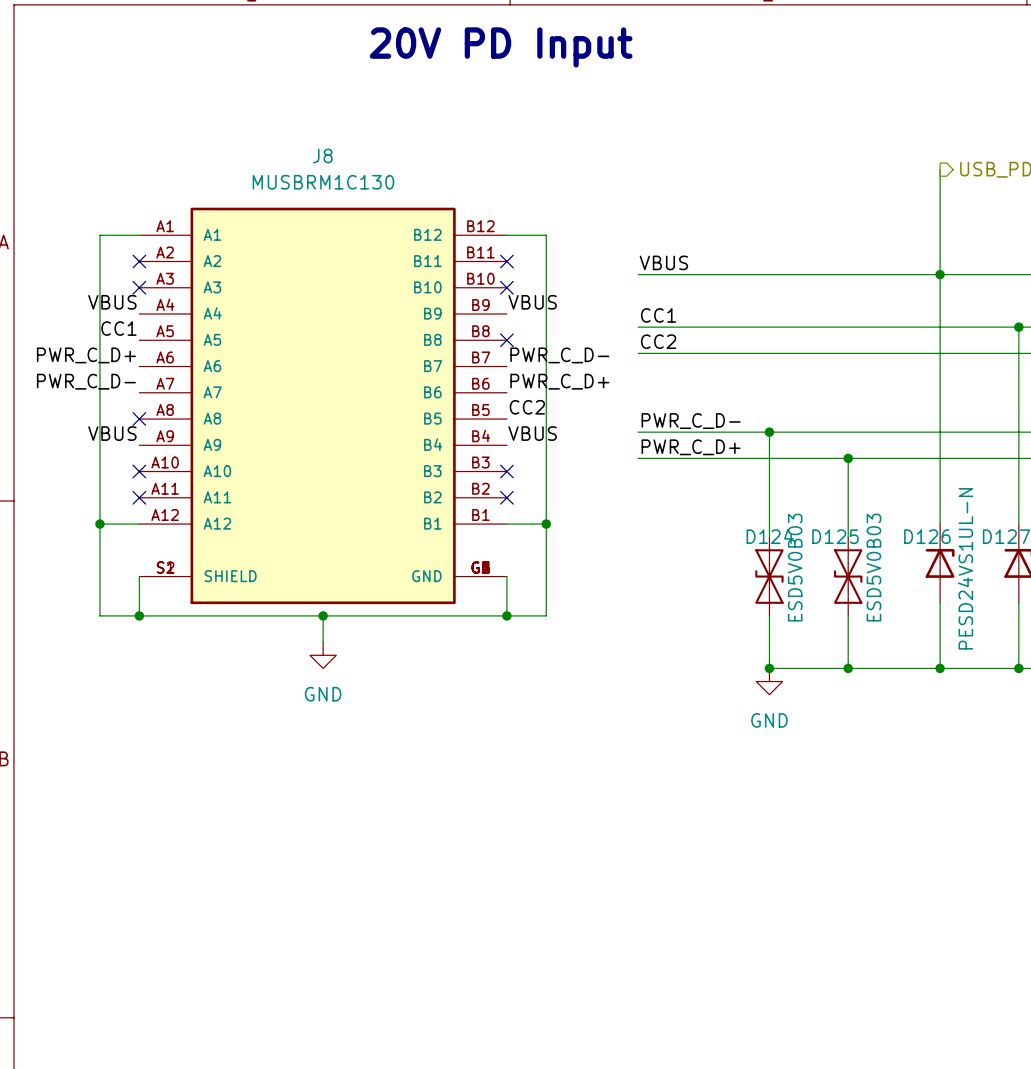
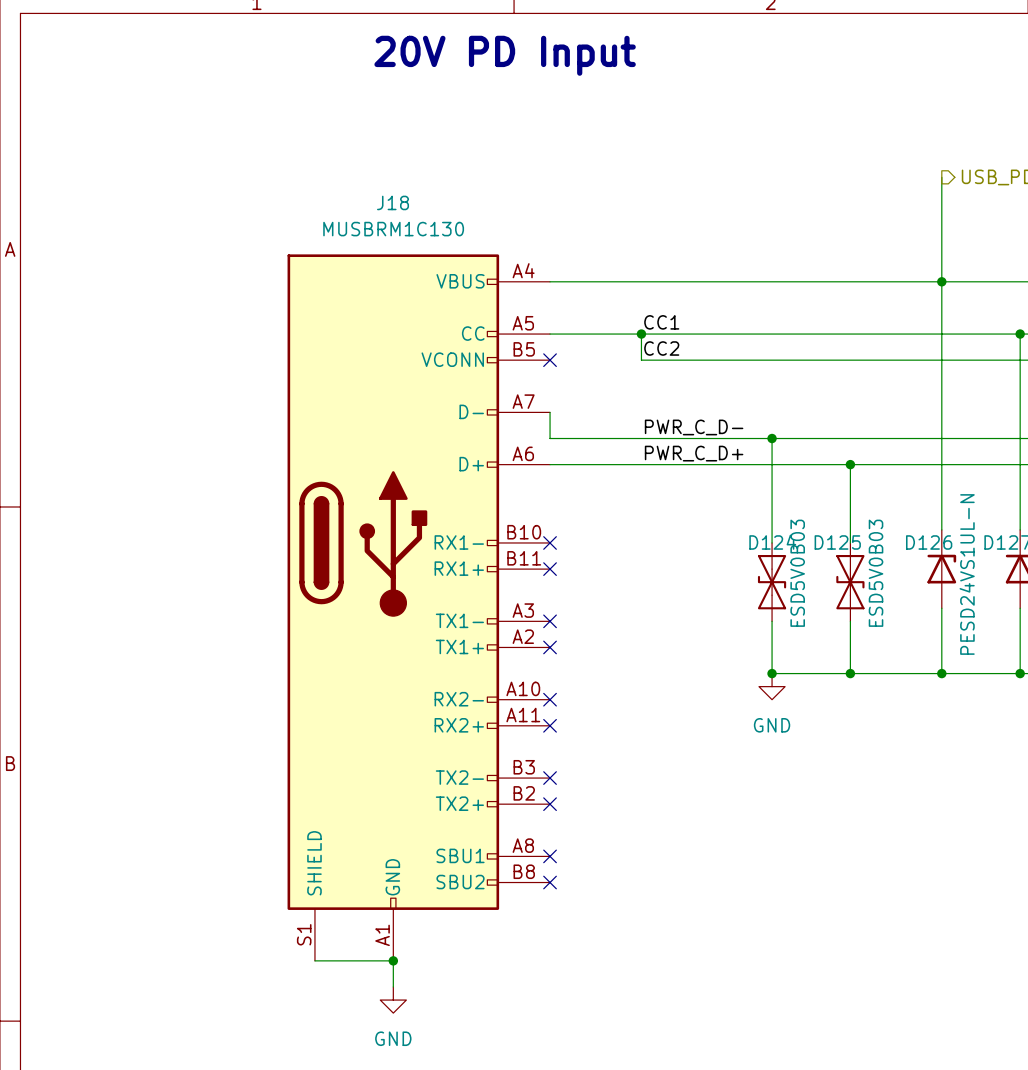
wire: (139, 235) (99, 235) (99, 615) (546, 615) (546, 432) -> (641, 438) (550, 438)
wire: (506, 235) (546, 235) (546, 405) -> none
no-connect mark: (139, 261) -> none
no-connect mark: (506, 261) -> none
label: VBUS (663, 262) -> none
wire: none -> (550, 281) (641, 281)
no-connect mark: (139, 287) -> none
no-connect mark: (506, 287) -> none
label: VBUS (112, 302) -> none
label: VBUS (532, 302) -> none
wire: none -> (550, 334) (641, 334) (641, 360)
junction: none -> (641, 334)
label: CC1 (118, 328) -> none
no-connect mark: (506, 340) -> none
no-connect mark: none -> (550, 360)
label: PWR_C_D+ (86, 355) -> none
label: PWR_C_D- (559, 355) -> none
label: PWR_C_D- (86, 381) -> none
label: PWR_C_D+ (559, 381) -> none
J8: MUSBRM1C130 (323, 405) -> none
label: CC2 (527, 407) -> none
no-connect mark: (139, 419) -> none
label: VBUS (112, 433) -> none
label: VBUS (532, 433) -> none
wire: none -> (550, 464) (641, 464)
no-connect mark: (139, 471) -> none
no-connect mark: (506, 471) -> none
no-connect mark: (139, 497) -> none
no-connect mark: (506, 497) -> none
wire: (99, 524) (139, 524) -> none
junction: (99, 524) -> none
wire: (506, 524) (546, 524) -> none
junction: (546, 524) -> none
no-connect mark: none -> (550, 542)
no-connect mark: none -> (550, 569)
wire: (139, 576) (139, 615) -> none
wire: (506, 576) (506, 615) -> none
J18: none -> MUSBRM1C130 (418, 607)
junction: (139, 615) -> none
junction: (323, 615) -> none
junction: (506, 615) -> none
no-connect mark: none -> (550, 621)
no-connect mark: none -> (550, 647)
power symbol: GND (323, 655) -> none
no-connect mark: none -> (550, 699)
no-connect mark: none -> (550, 725)
no-connect mark: none -> (550, 778)
no-connect mark: none -> (550, 804)
no-connect mark: none -> (550, 856)
no-connect mark: none -> (550, 882)
wire: none -> (314, 960) (393, 960) (393, 986)
junction: none -> (393, 960)
power symbol: none -> GND (393, 1000)

